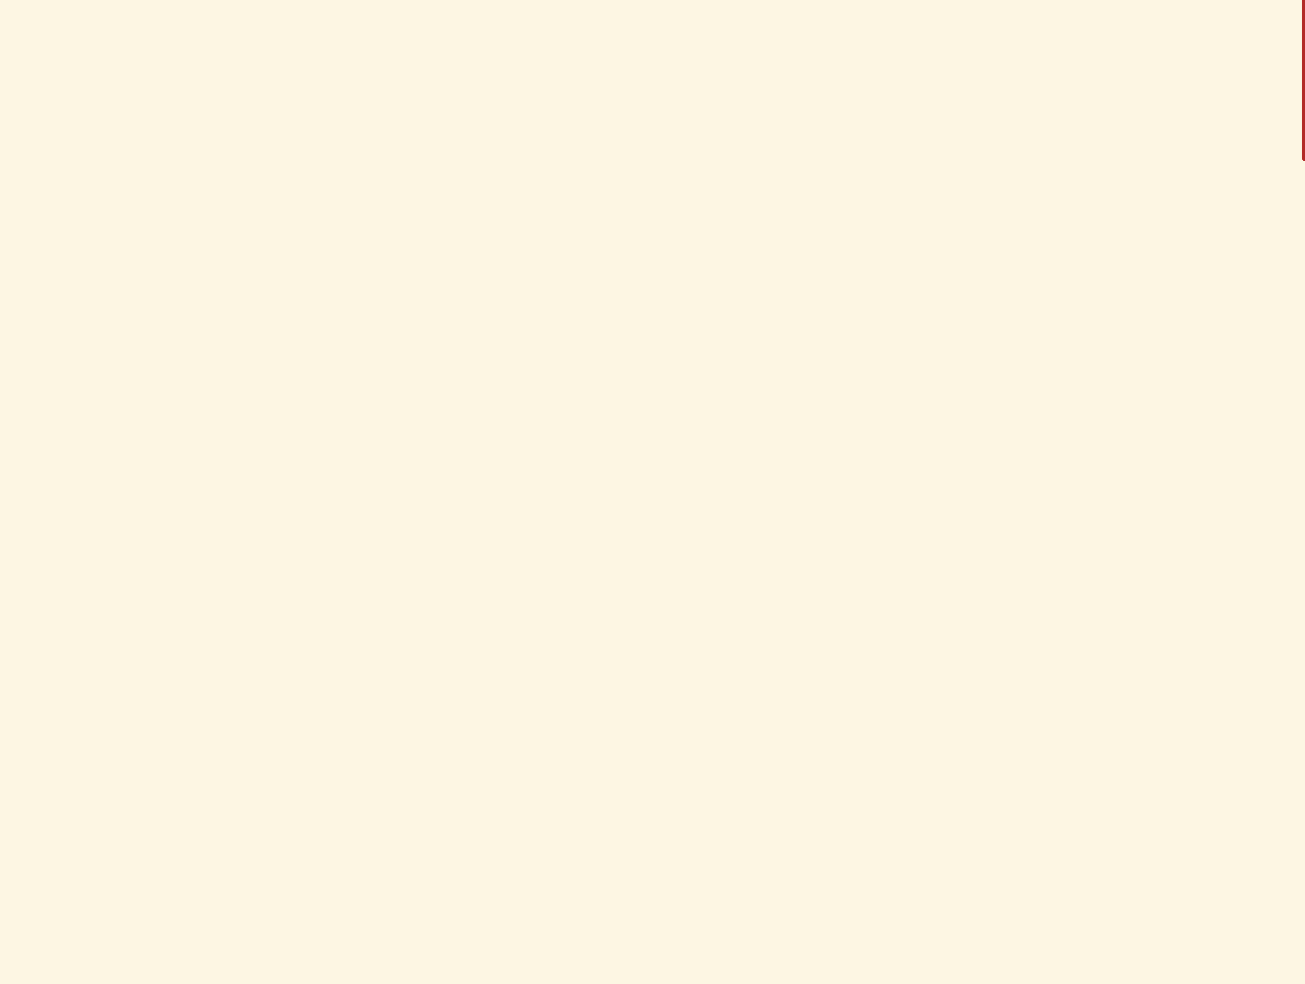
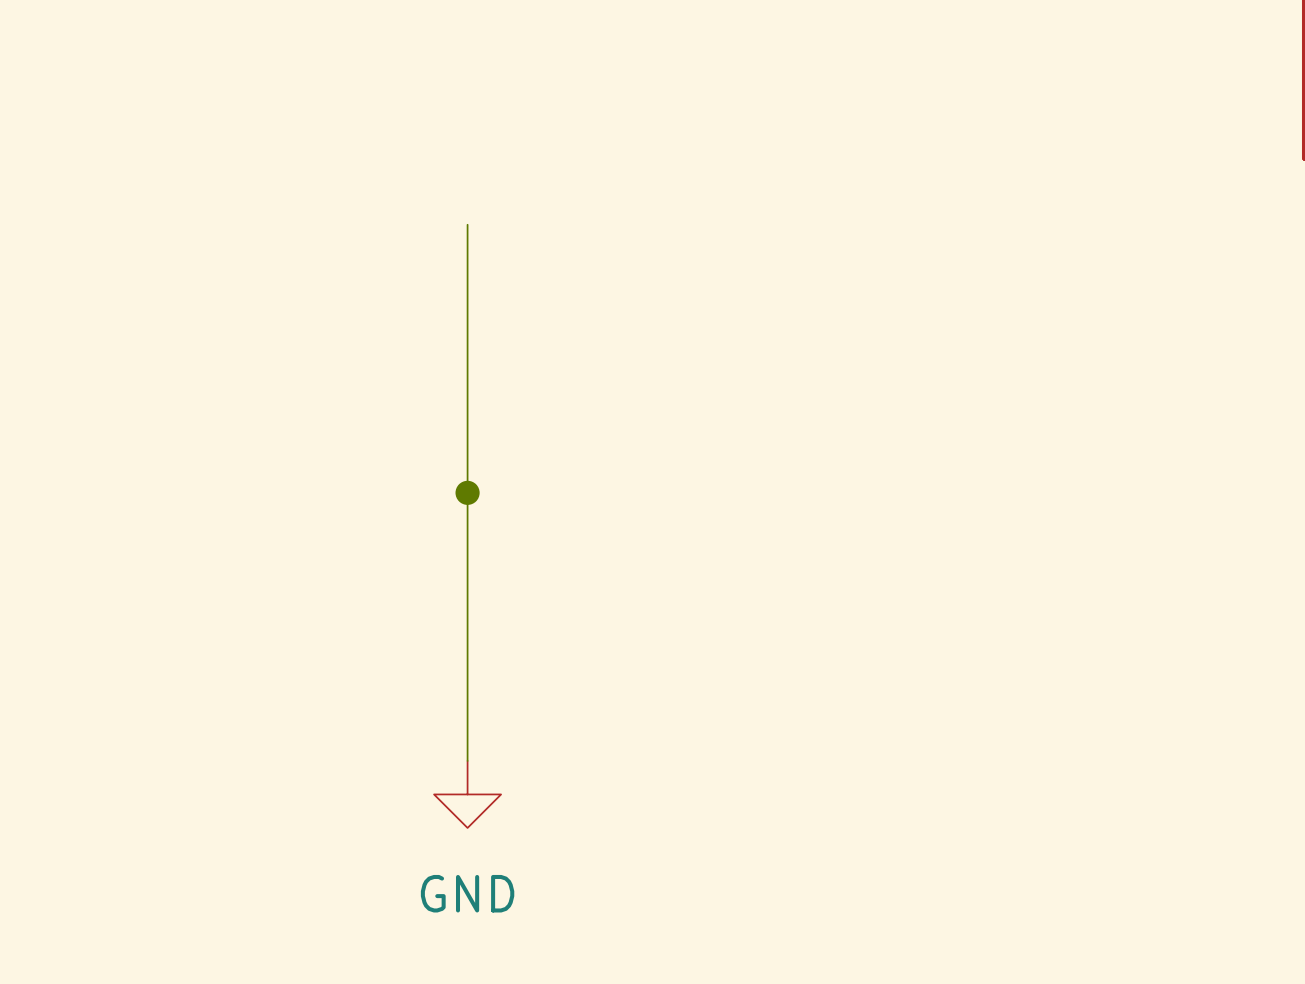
wire: none -> (467, 224) (467, 760)
junction: none -> (467, 492)
power symbol: none -> GND (467, 794)

